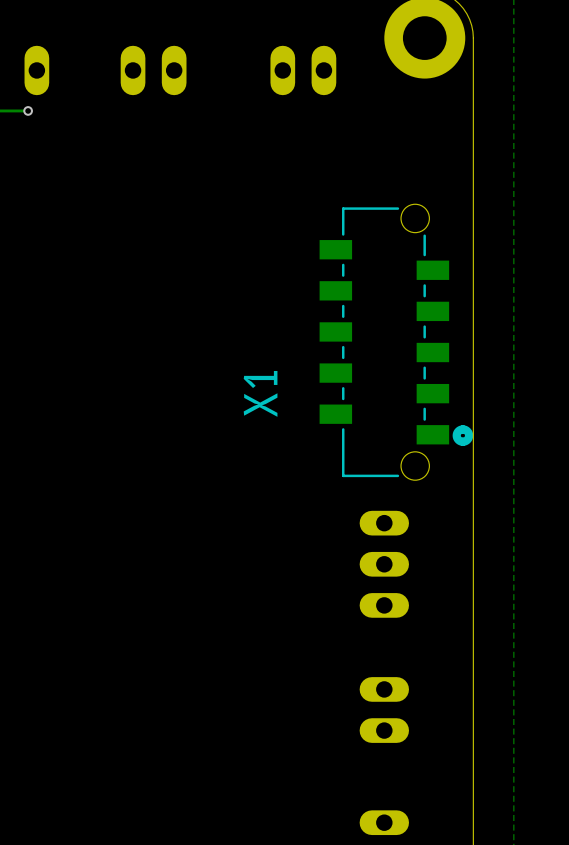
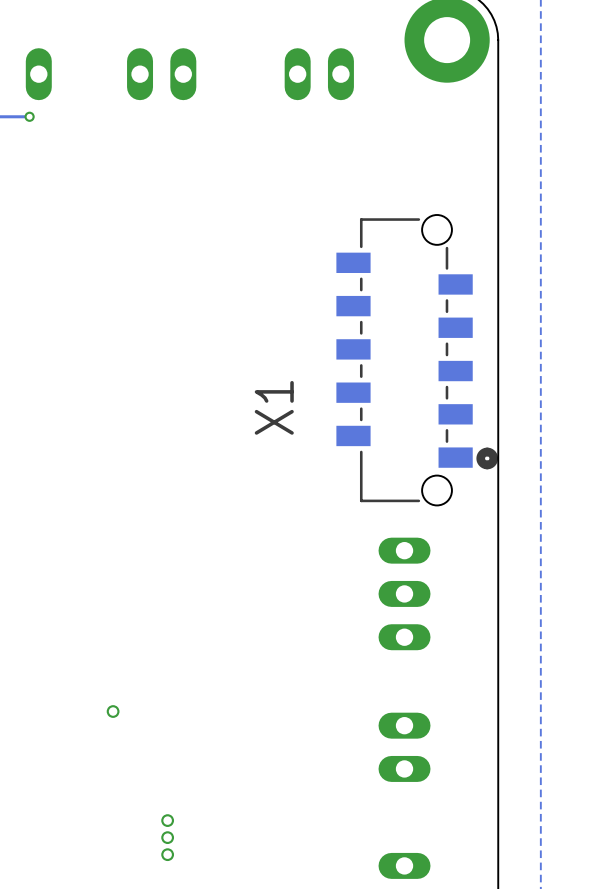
via: none -> (113, 711)
via: none -> (167, 820)
via: none -> (167, 837)
via: none -> (167, 854)

